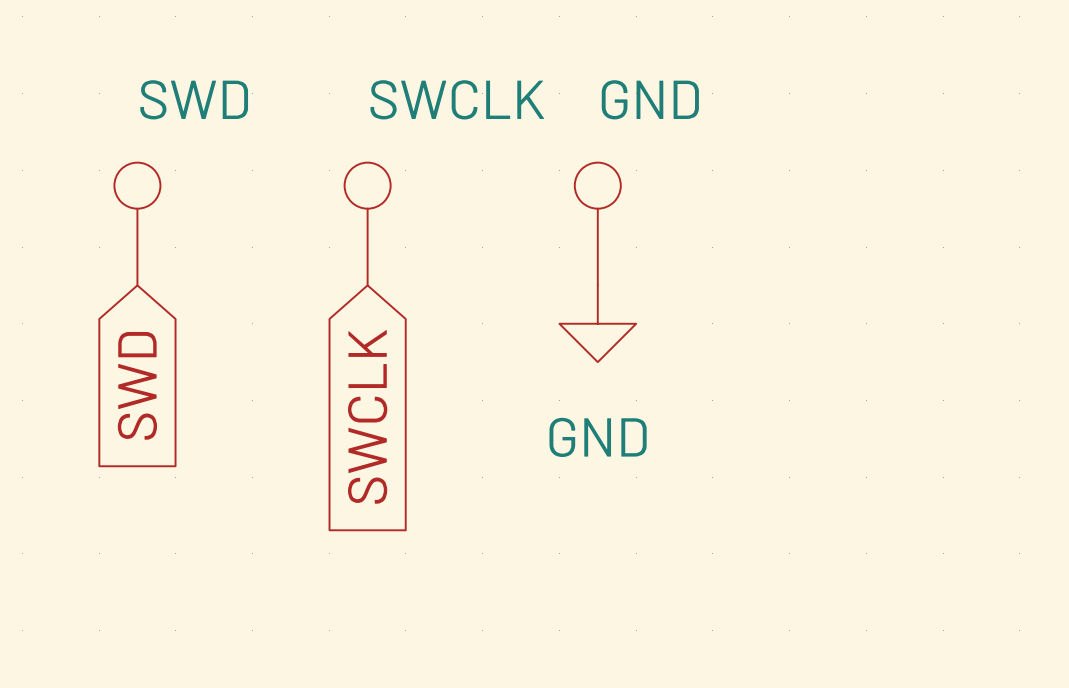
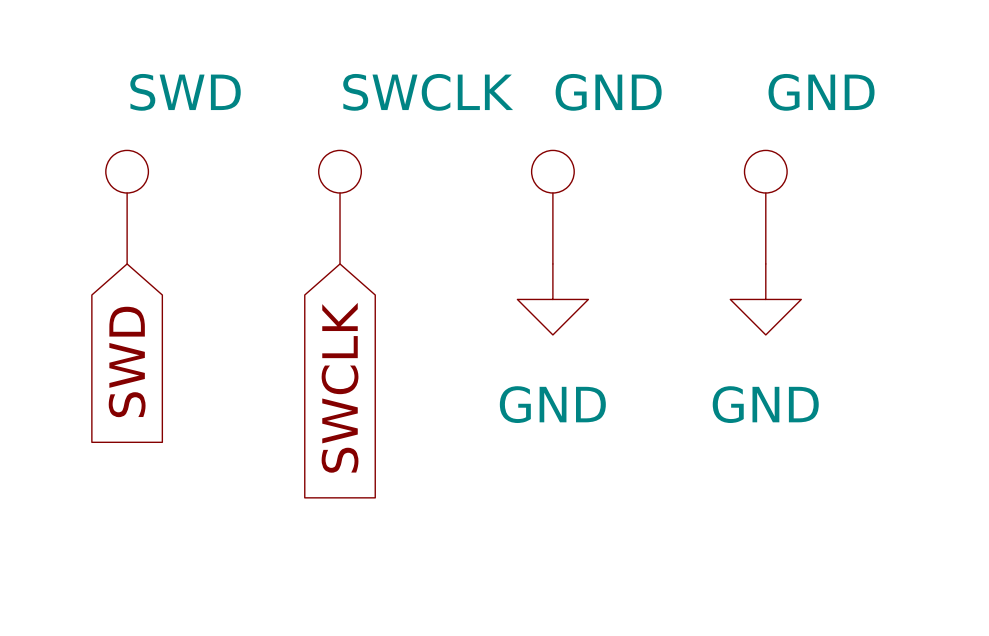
part: none -> GND (765, 207)
power symbol: none -> GND (765, 299)

